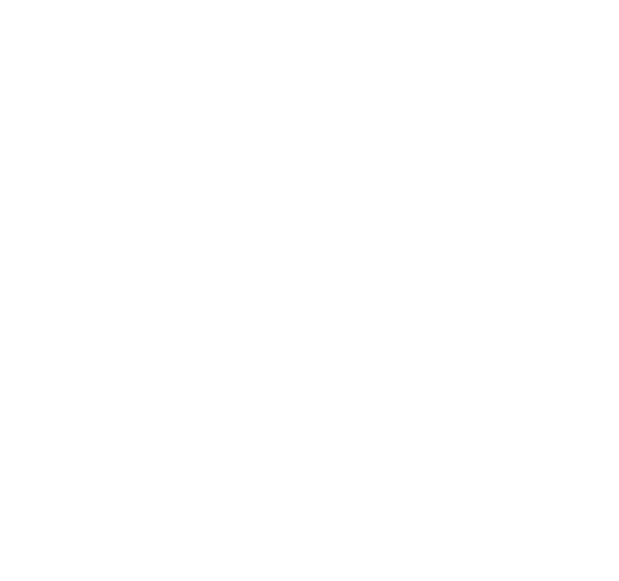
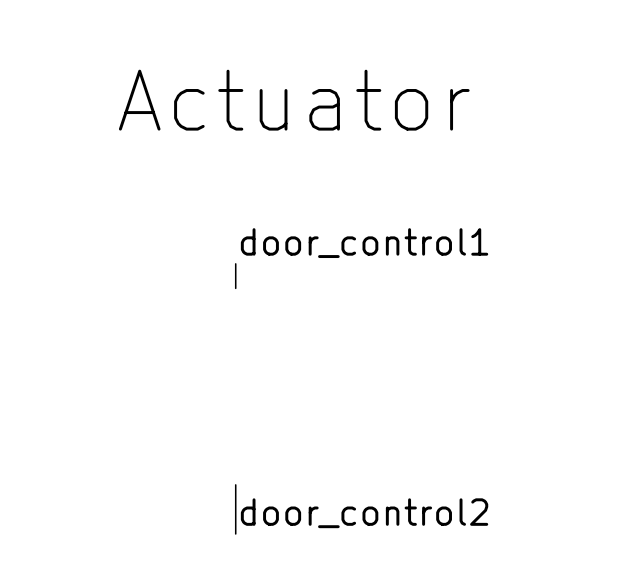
text: none -> Actuator (294, 100)
label: none -> door_control1 (364, 243)
wire: none -> (235, 263) (235, 288)
wire: none -> (235, 484) (235, 533)
label: none -> door_control2 (364, 513)

